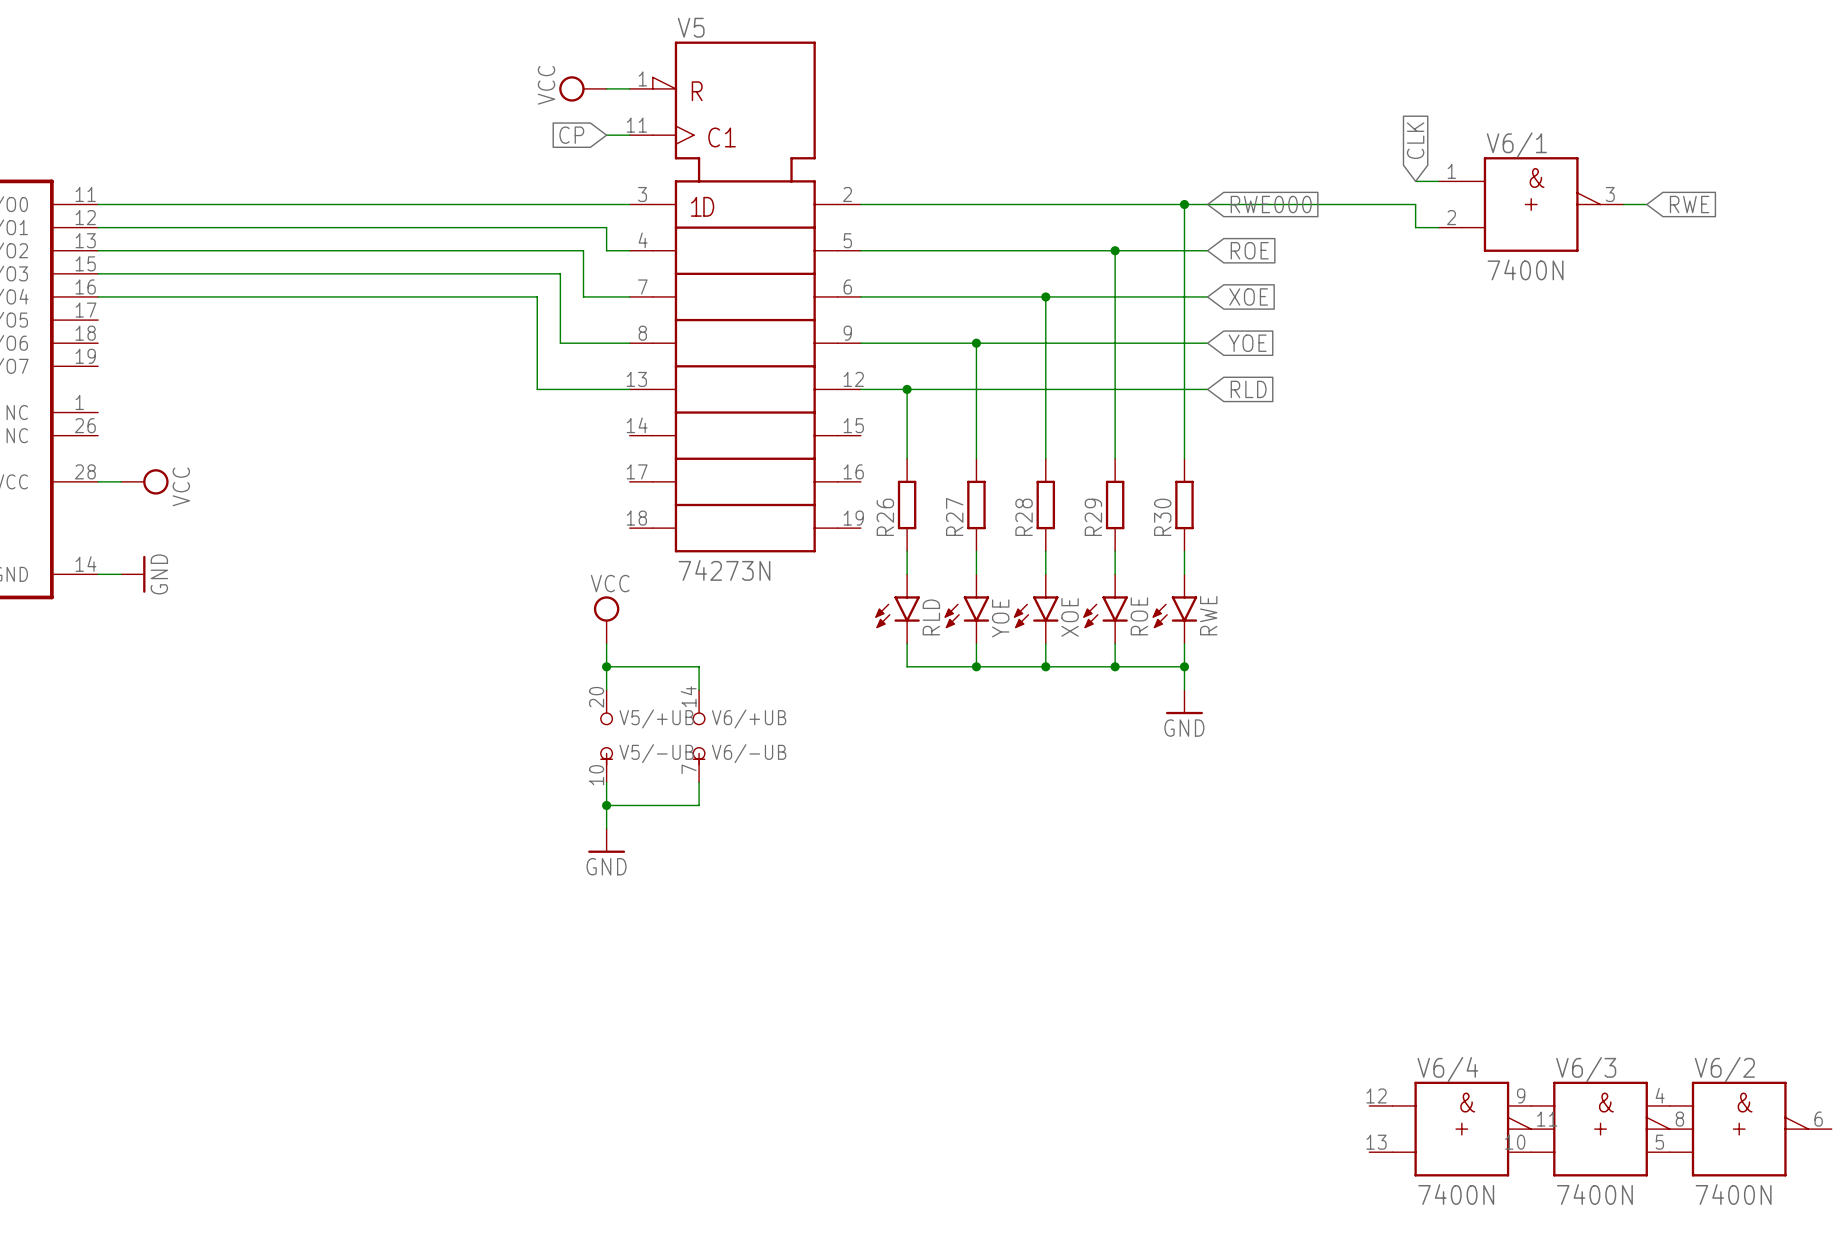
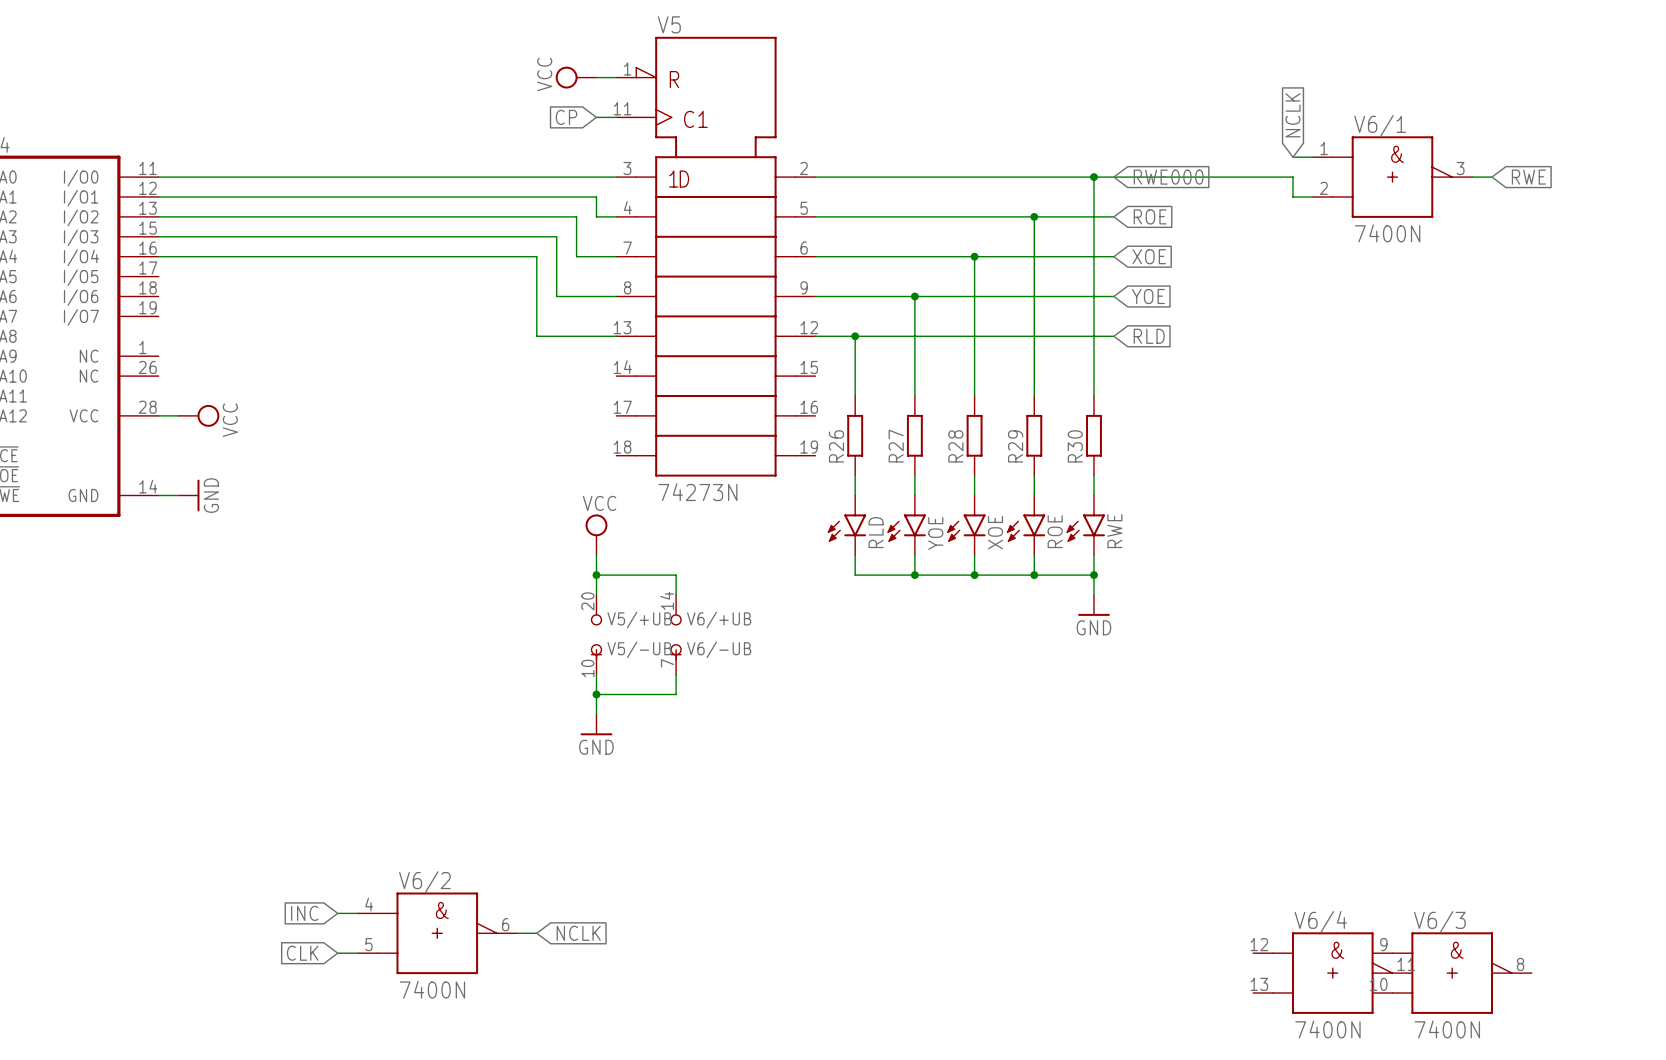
global label: CLK (1415, 140) -> NCLK (1292, 115)
global label: none -> INC (304, 913)
wire: none -> (337, 913) (357, 913)
wire: none -> (516, 933) (536, 933)
global label: none -> NCLK (578, 933)
global label: none -> CLK (302, 953)
wire: none -> (337, 953) (357, 953)
V6/2 position: (1739, 1129) -> (437, 933)

